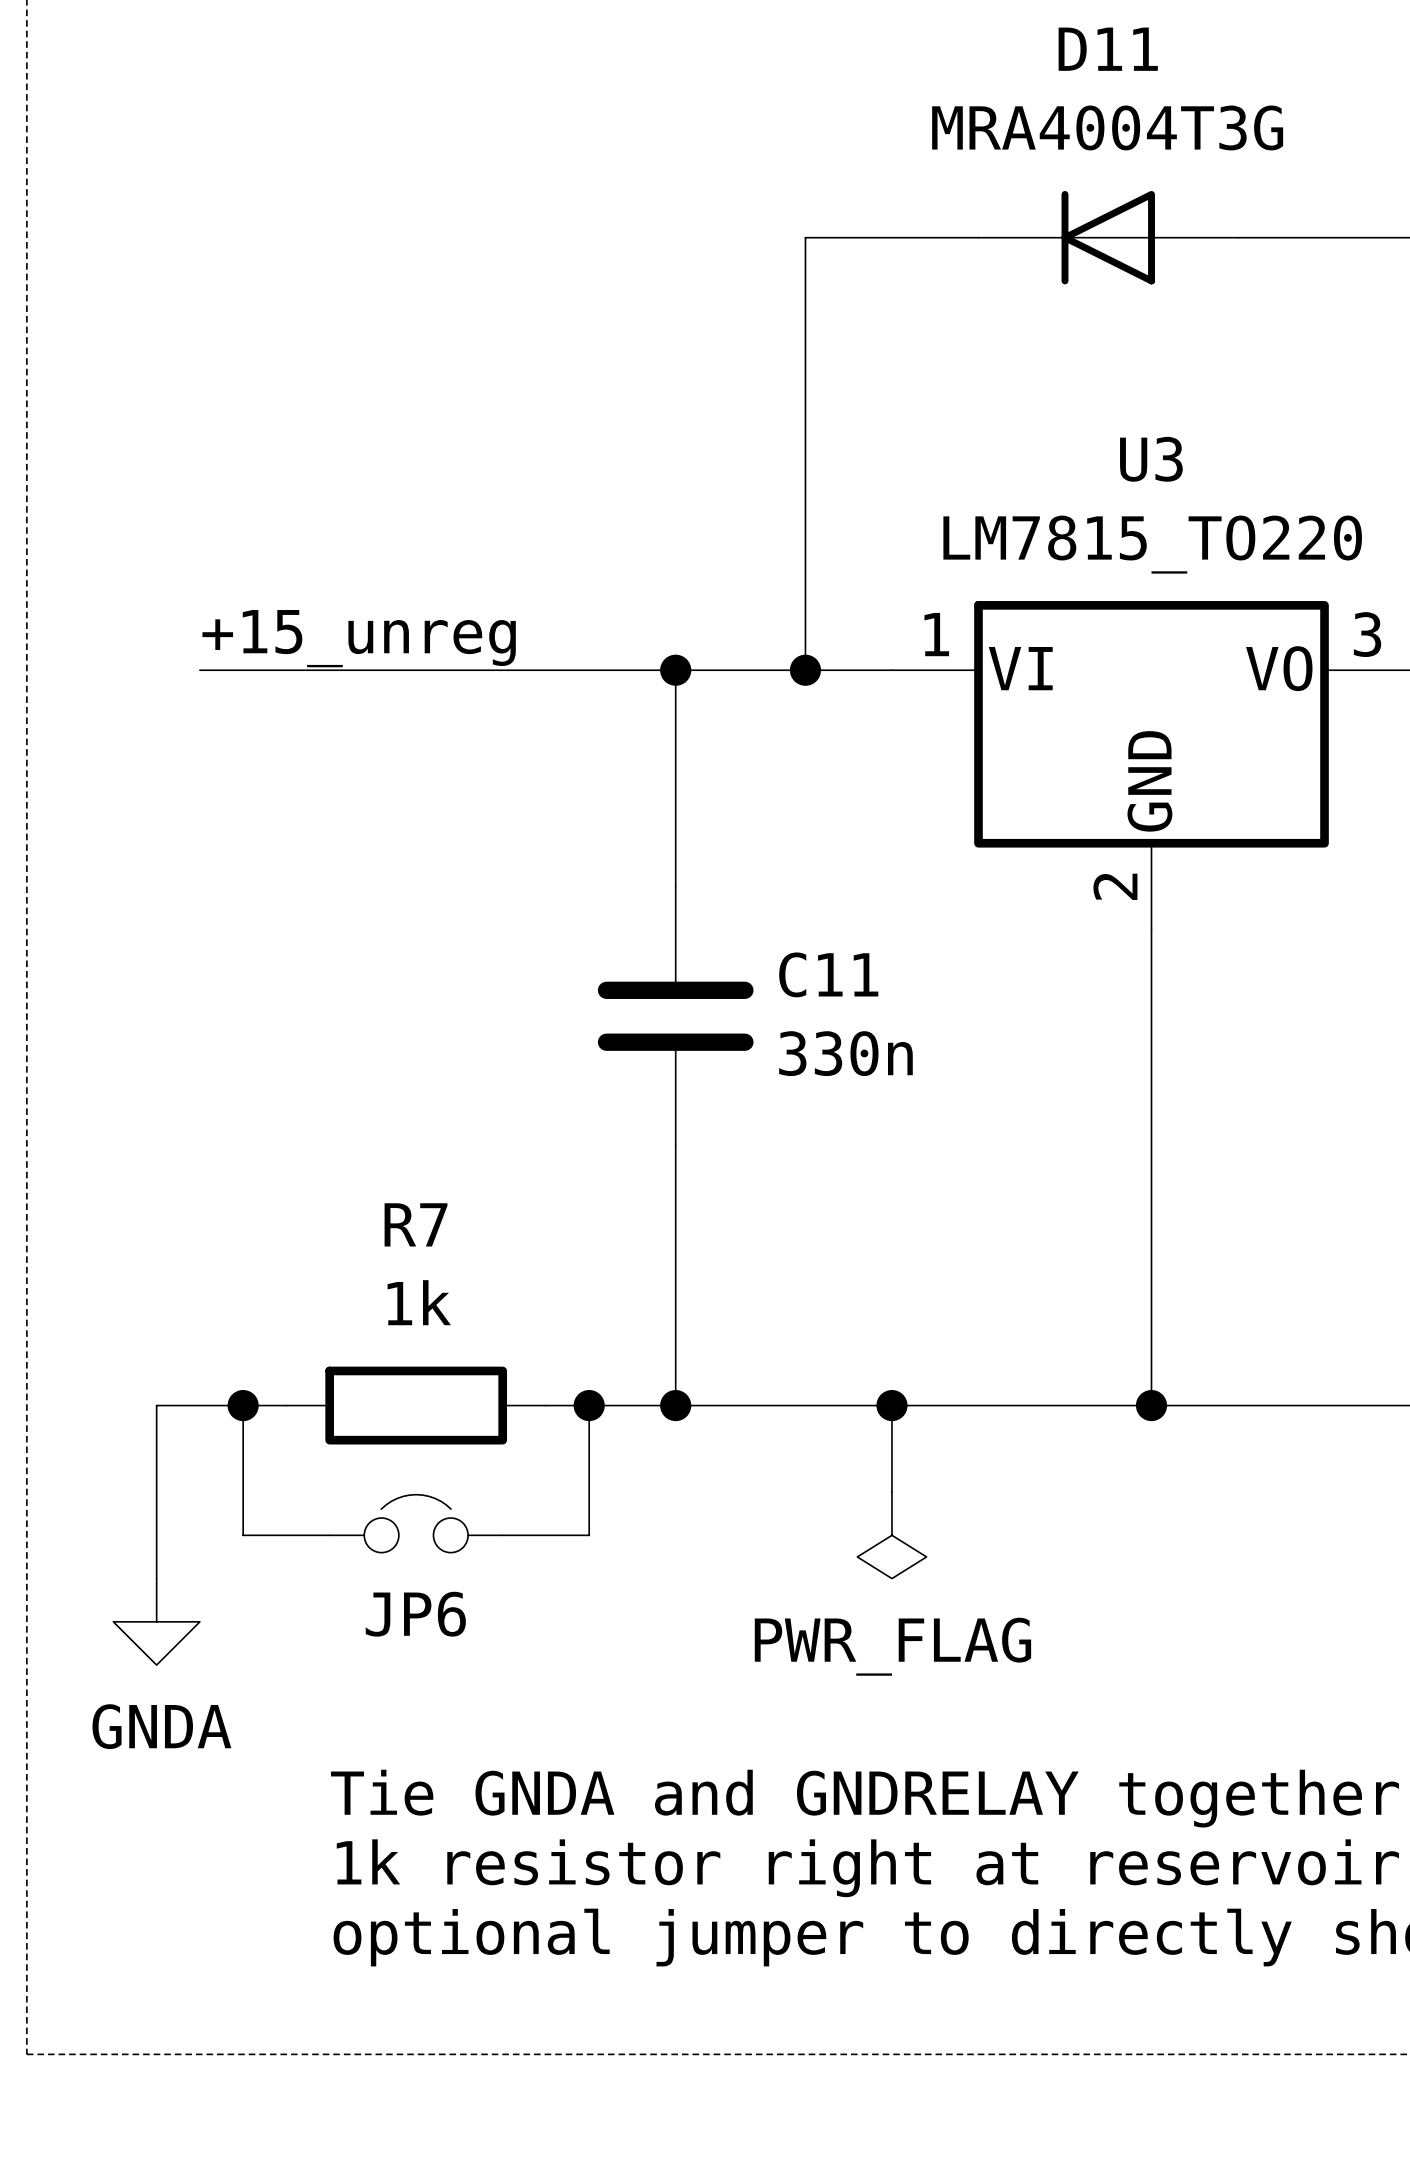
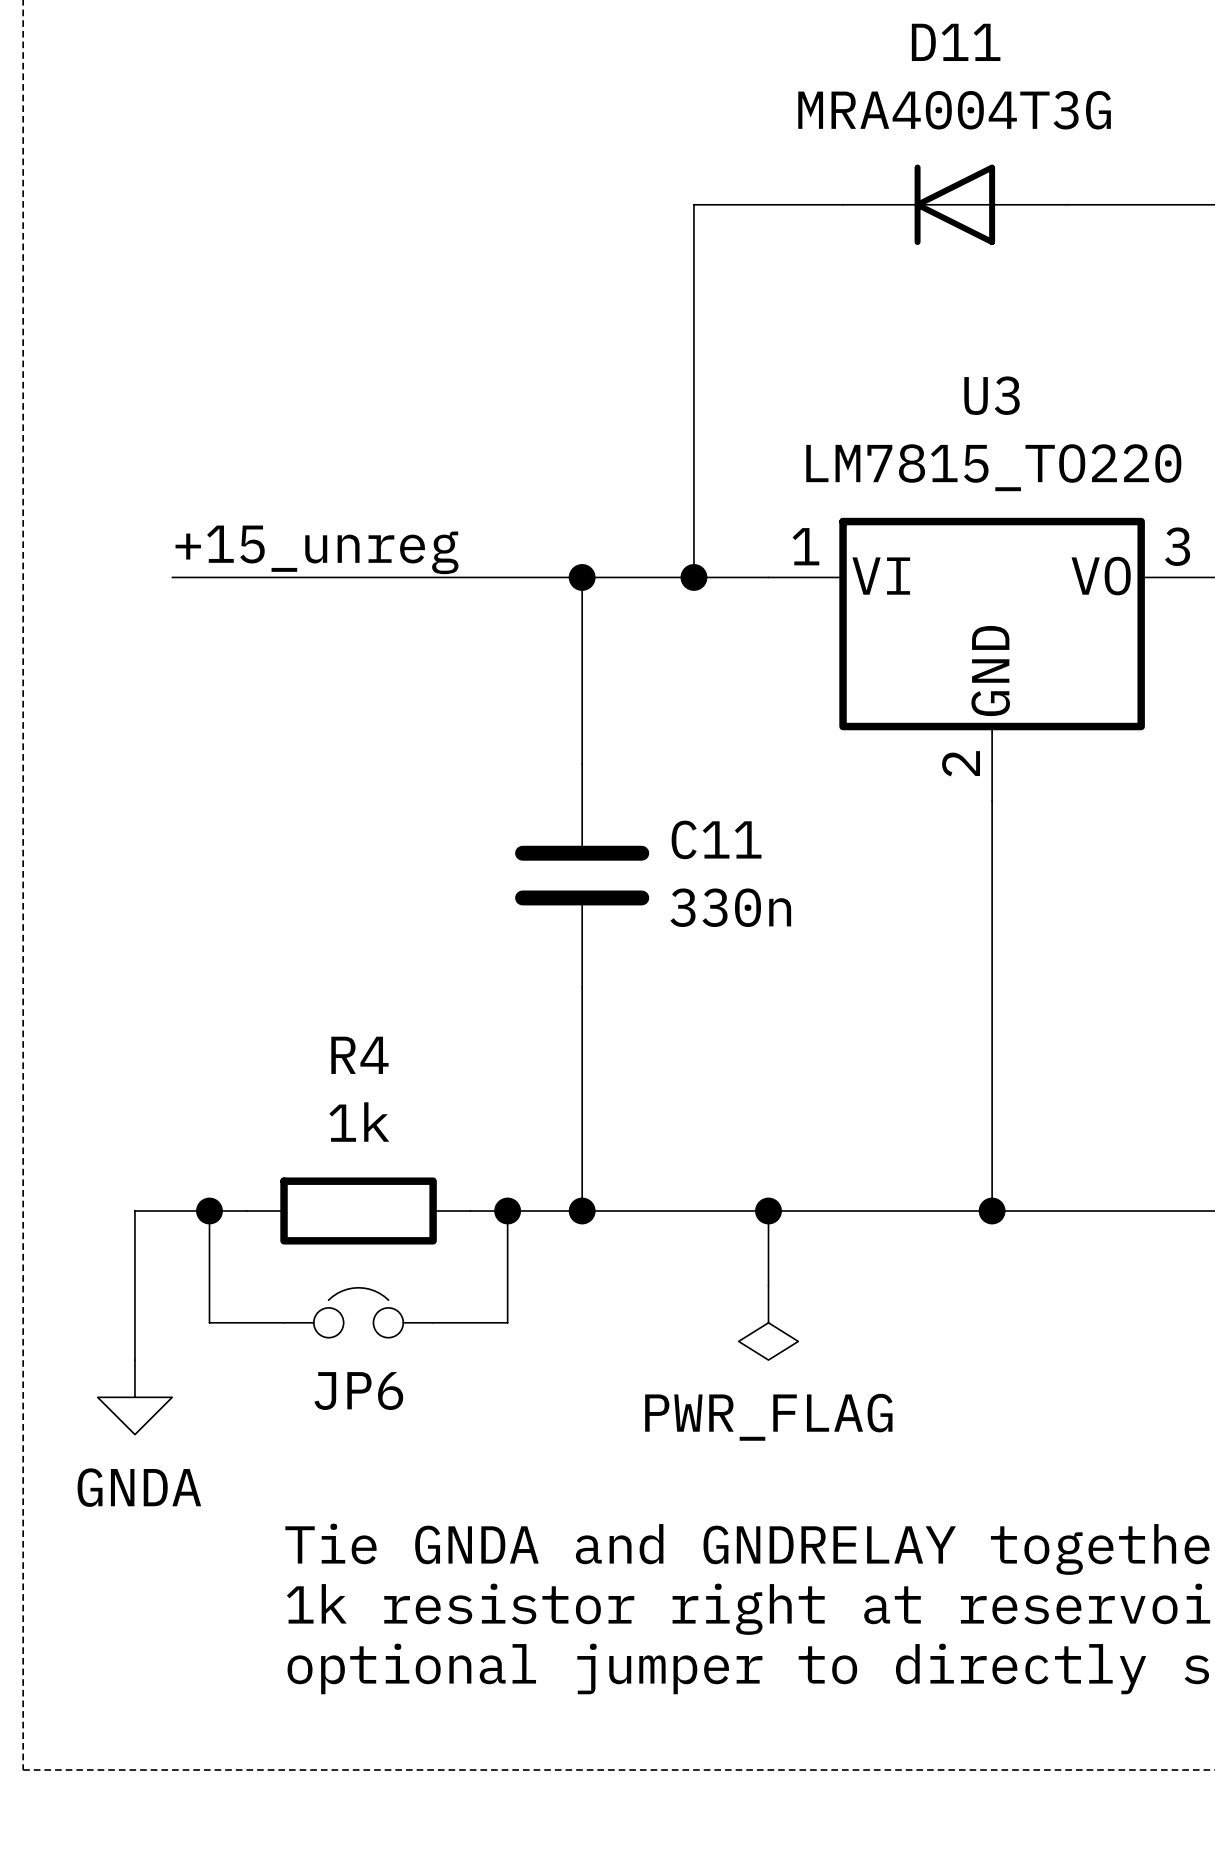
R7 name: R7 (416, 1224) -> R4 (359, 1055)

